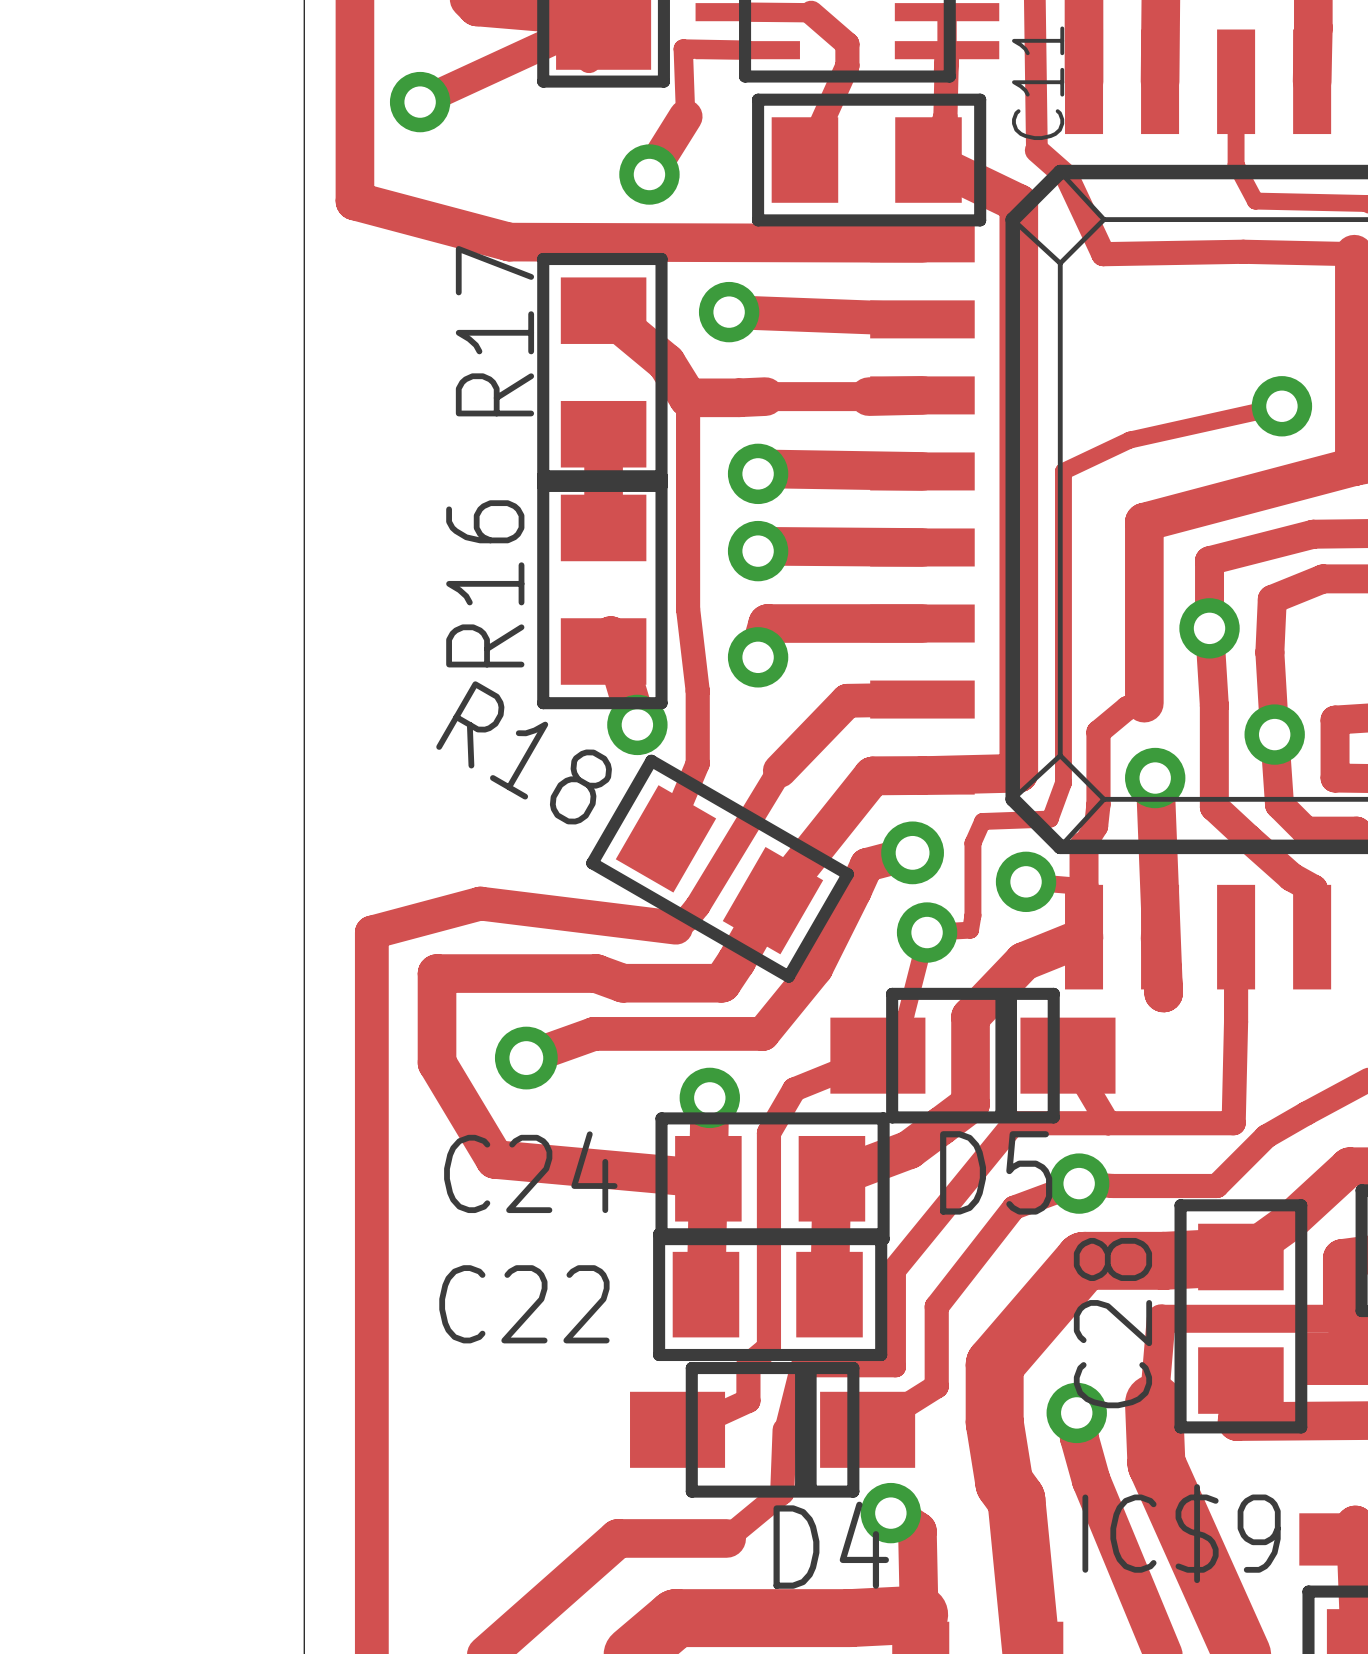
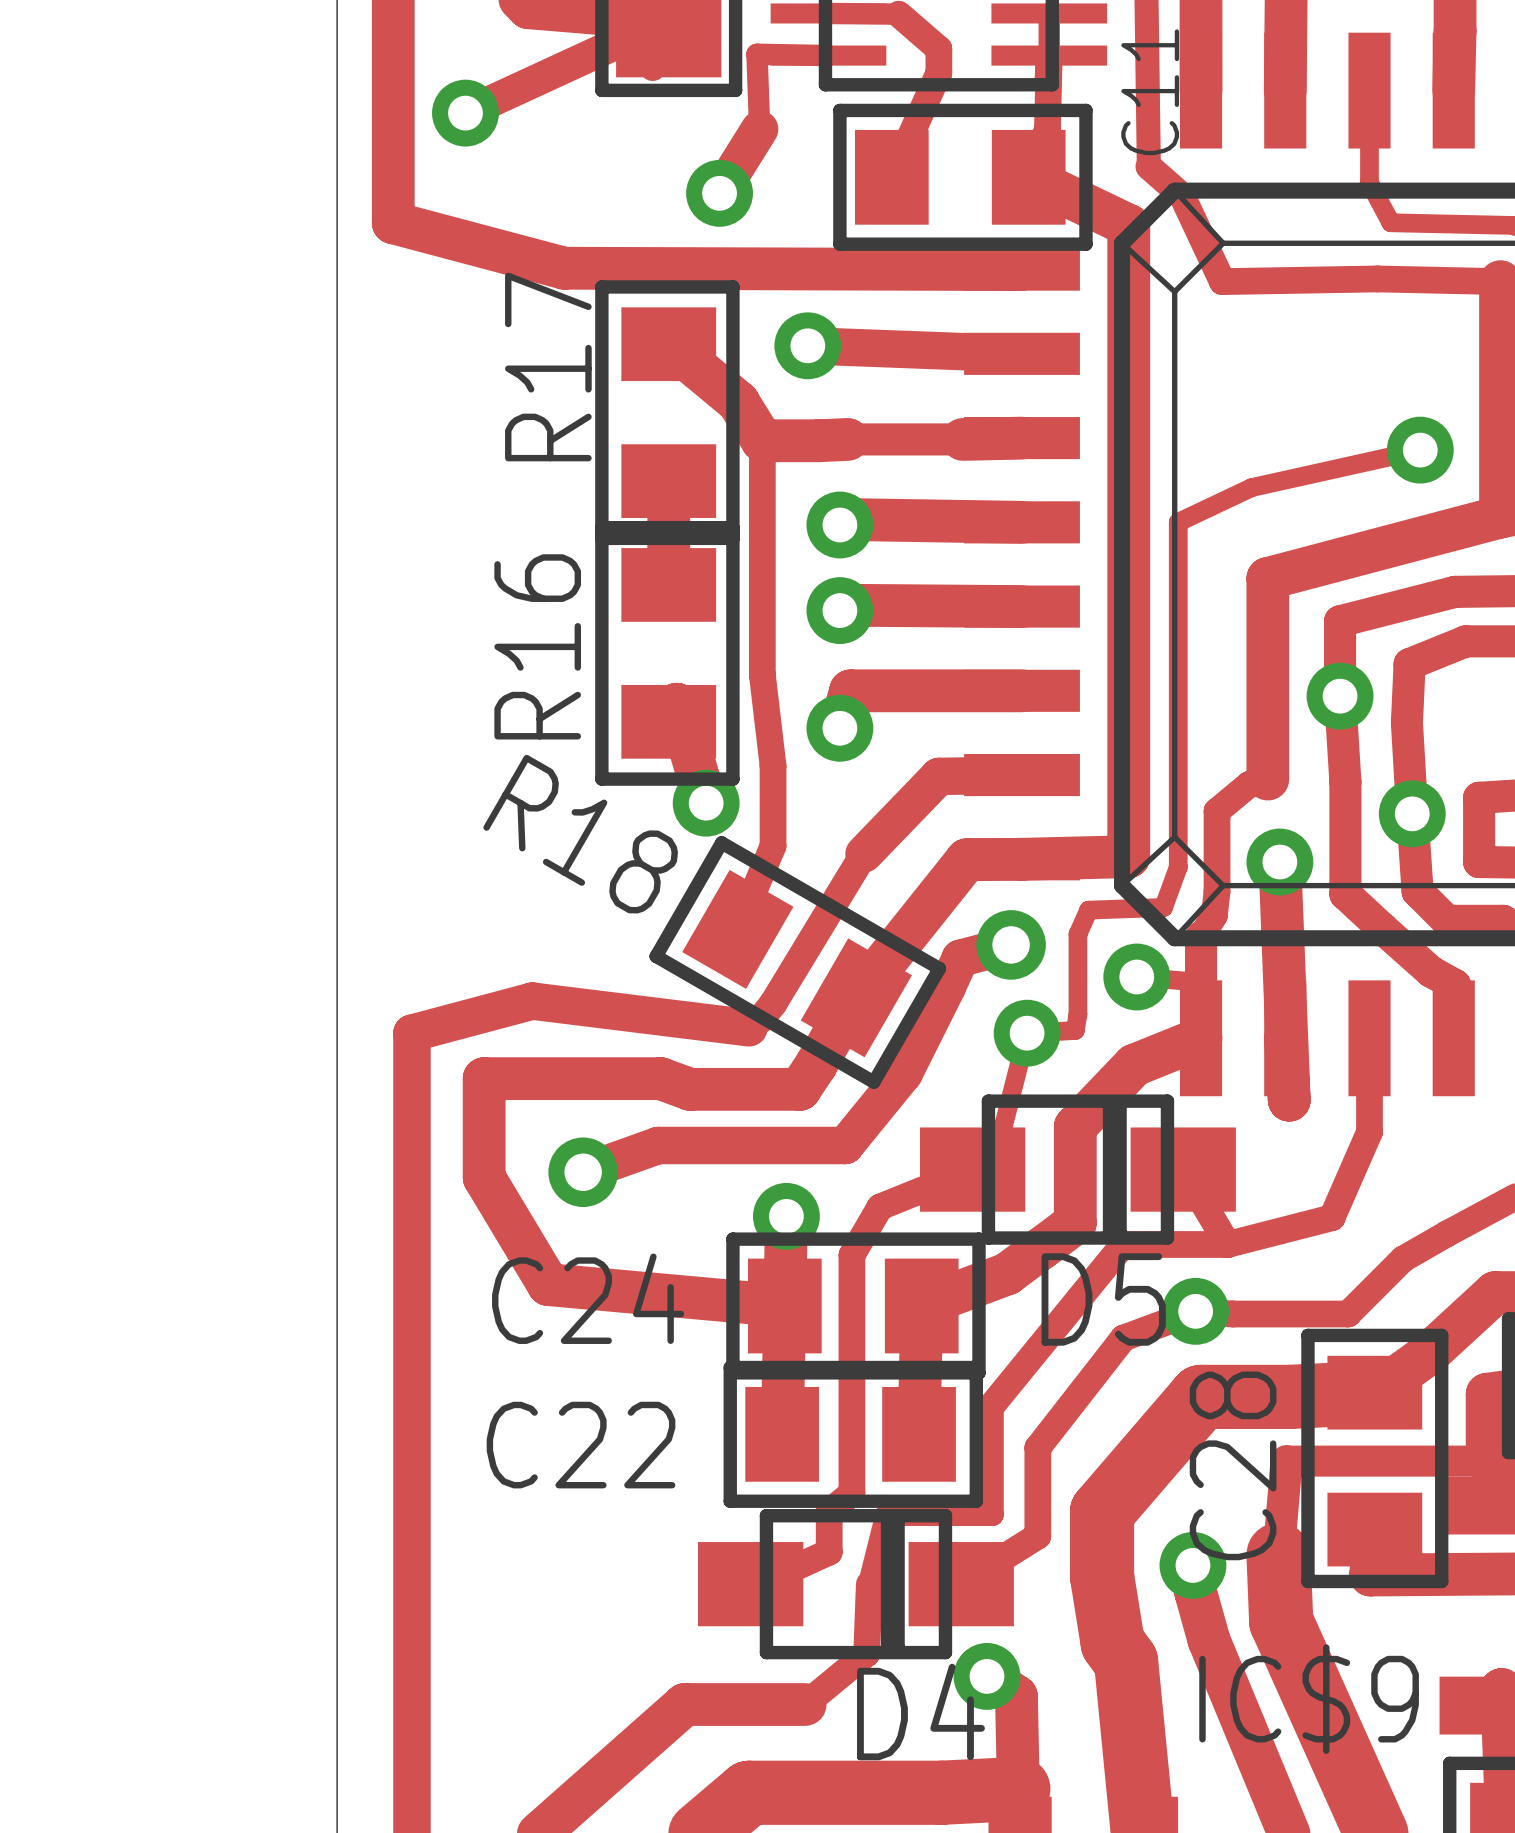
track: (1236, 1021) (1233, 1123) (1108, 1123) -> (1369, 1132) (1332, 1217) (1227, 1244)

